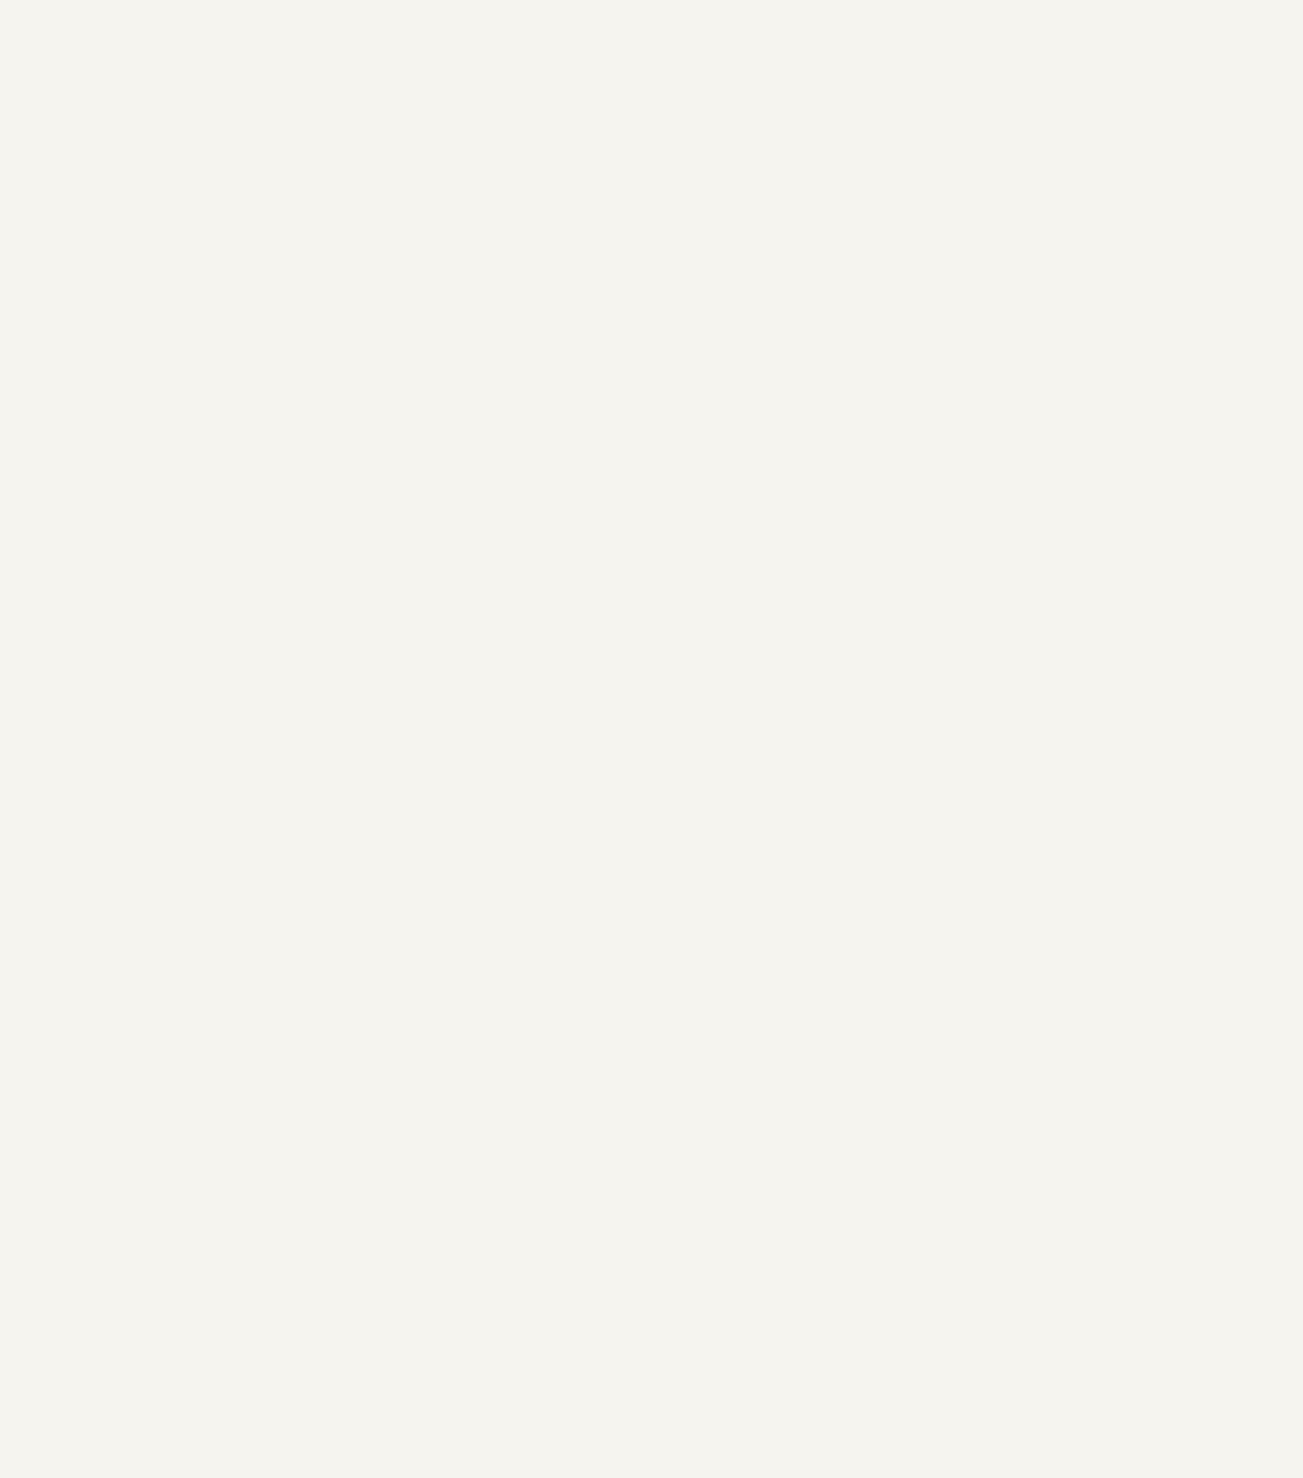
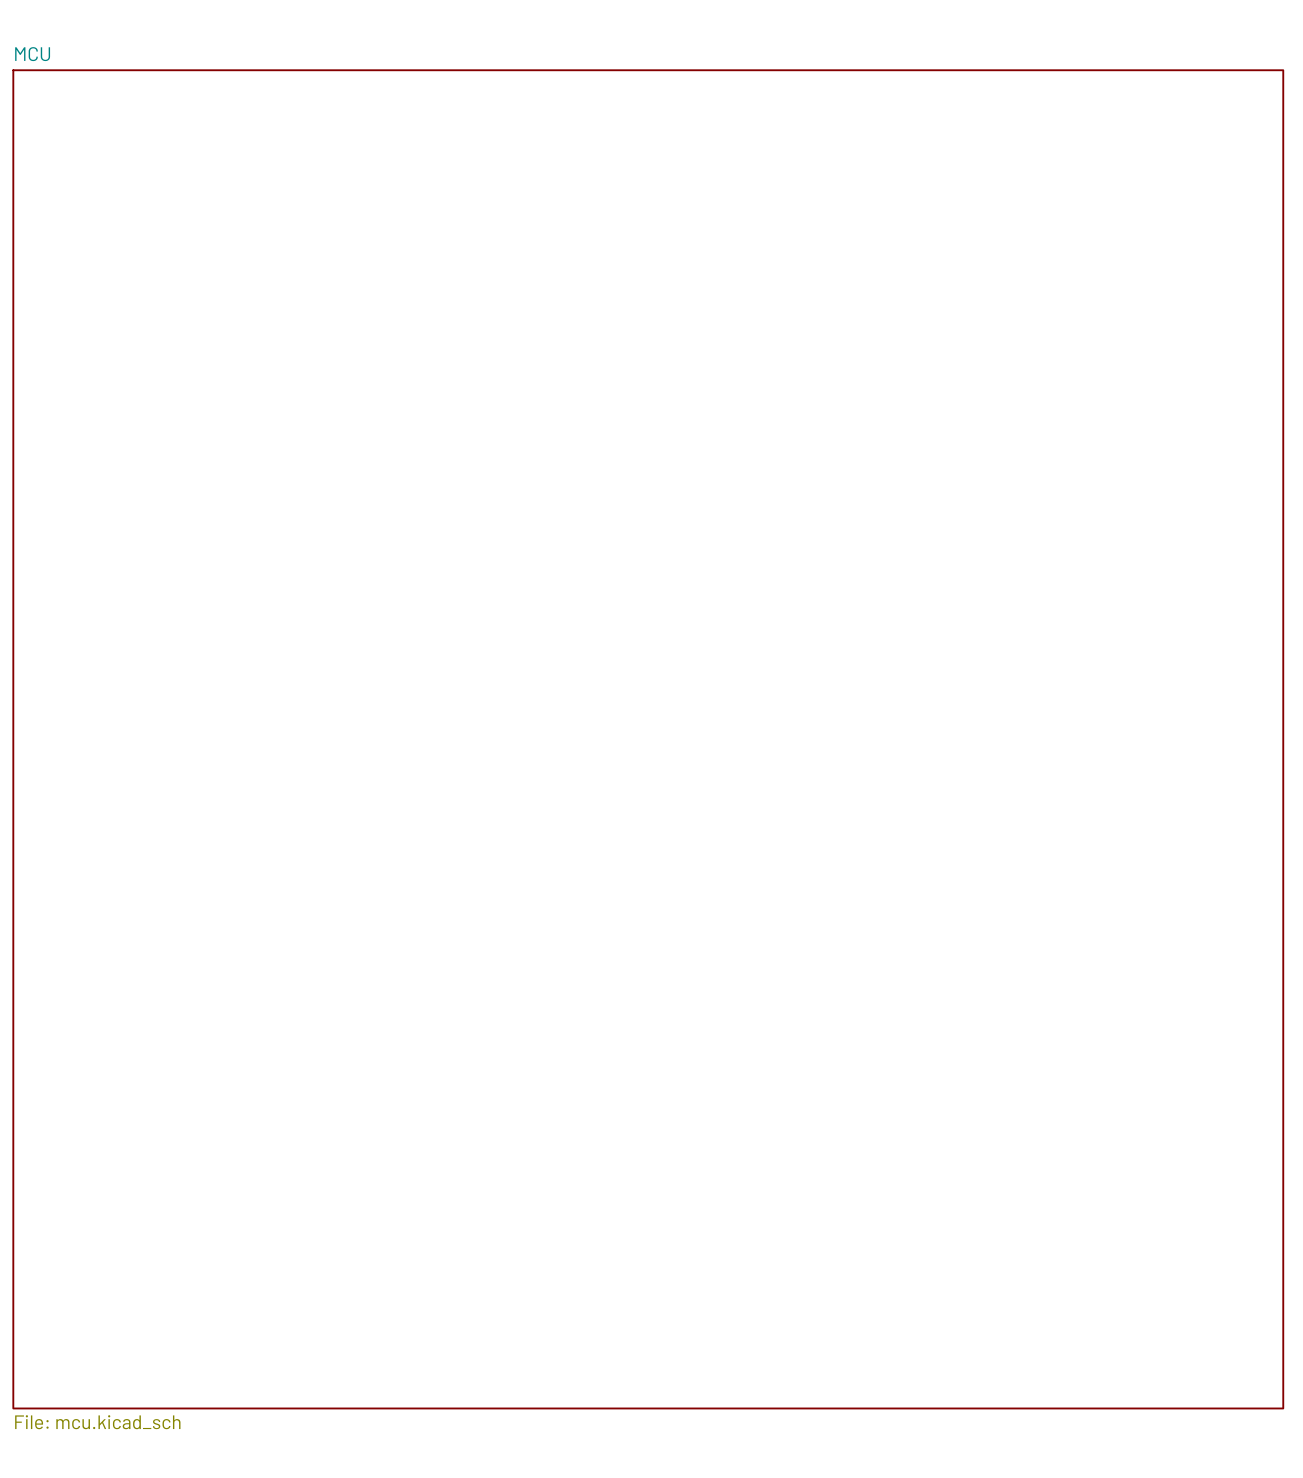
sheet MCU: none -> File: mcu.kicad_sch (648, 739)

